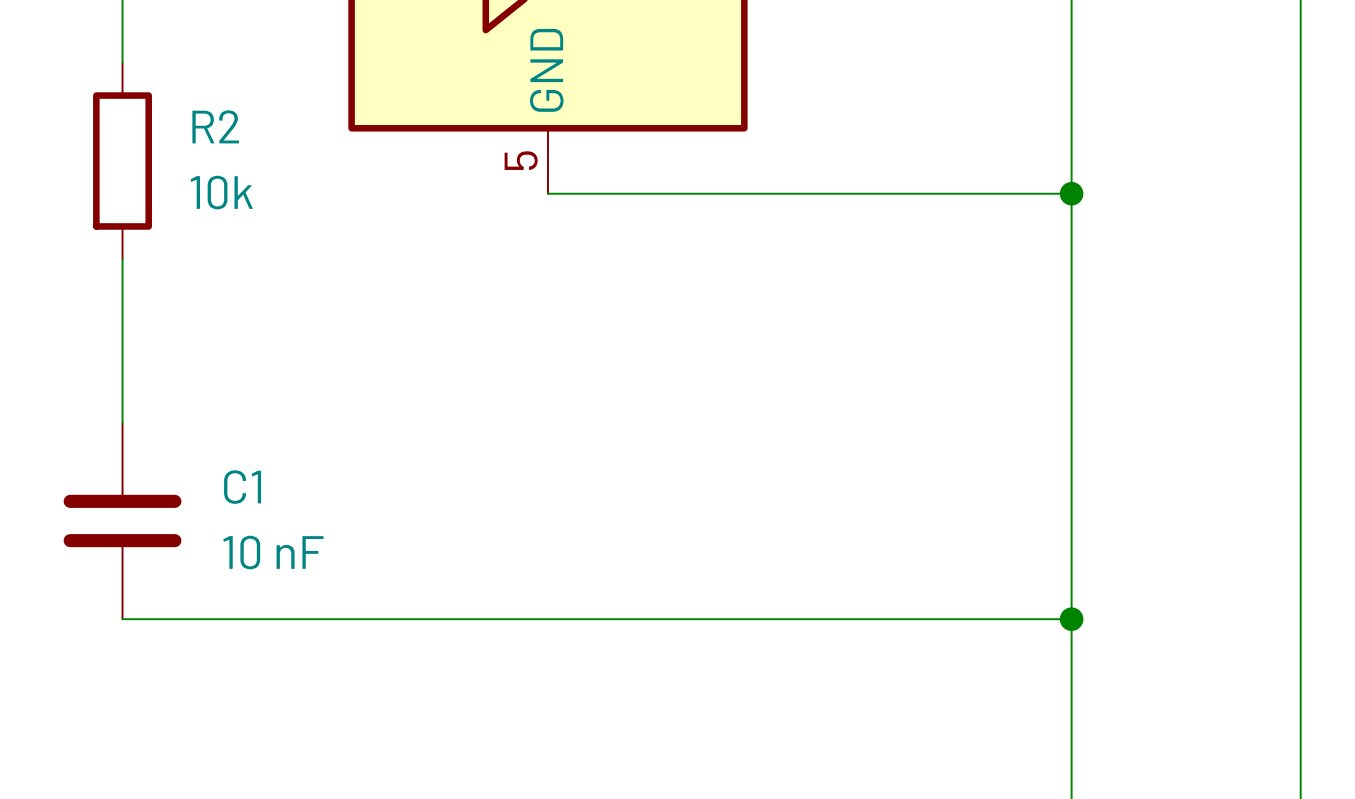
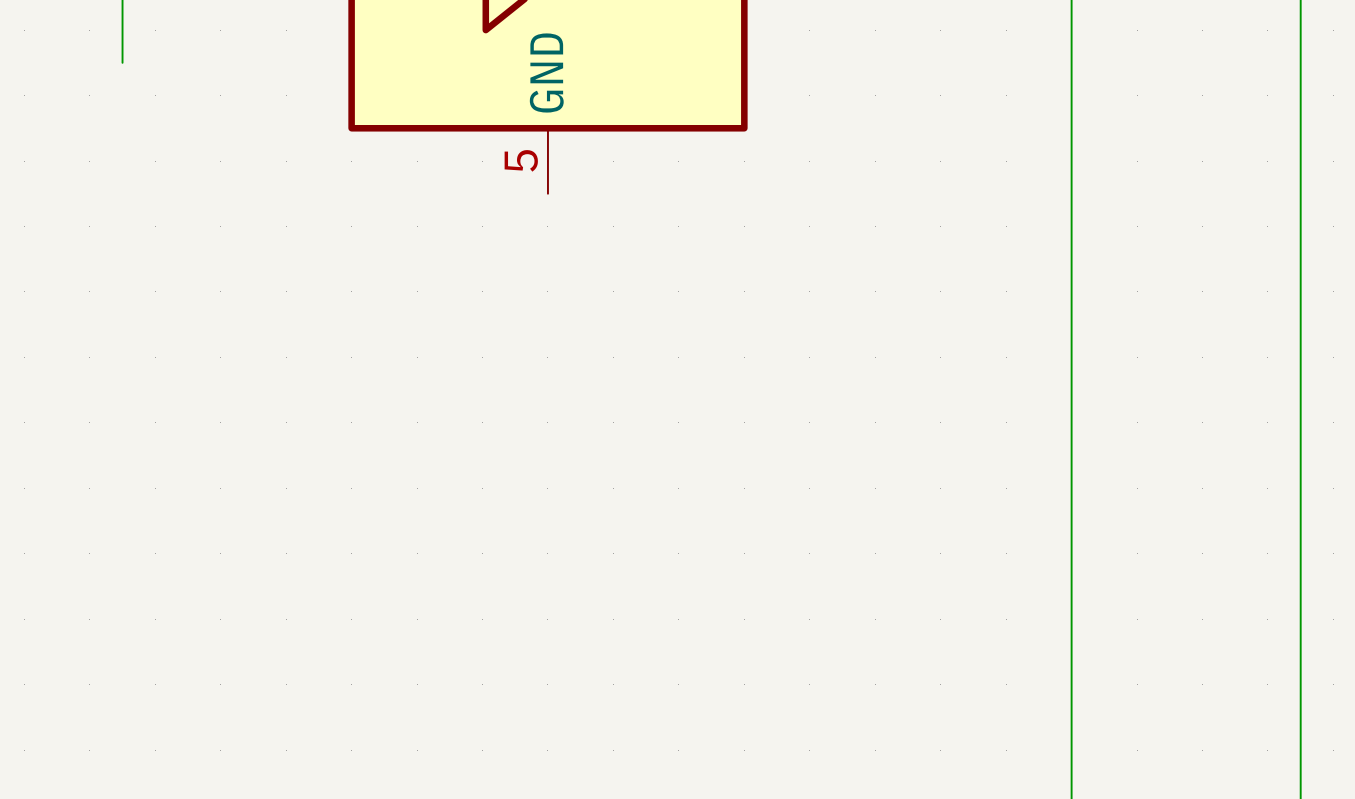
R2: 10k (122, 161) -> none
wire: (547, 193) (1071, 193) -> none
junction: (1071, 193) -> none
wire: (122, 259) (122, 422) -> none
C1: 10 nF (122, 521) -> none
wire: (122, 619) (1071, 619) -> none
junction: (1071, 619) -> none

